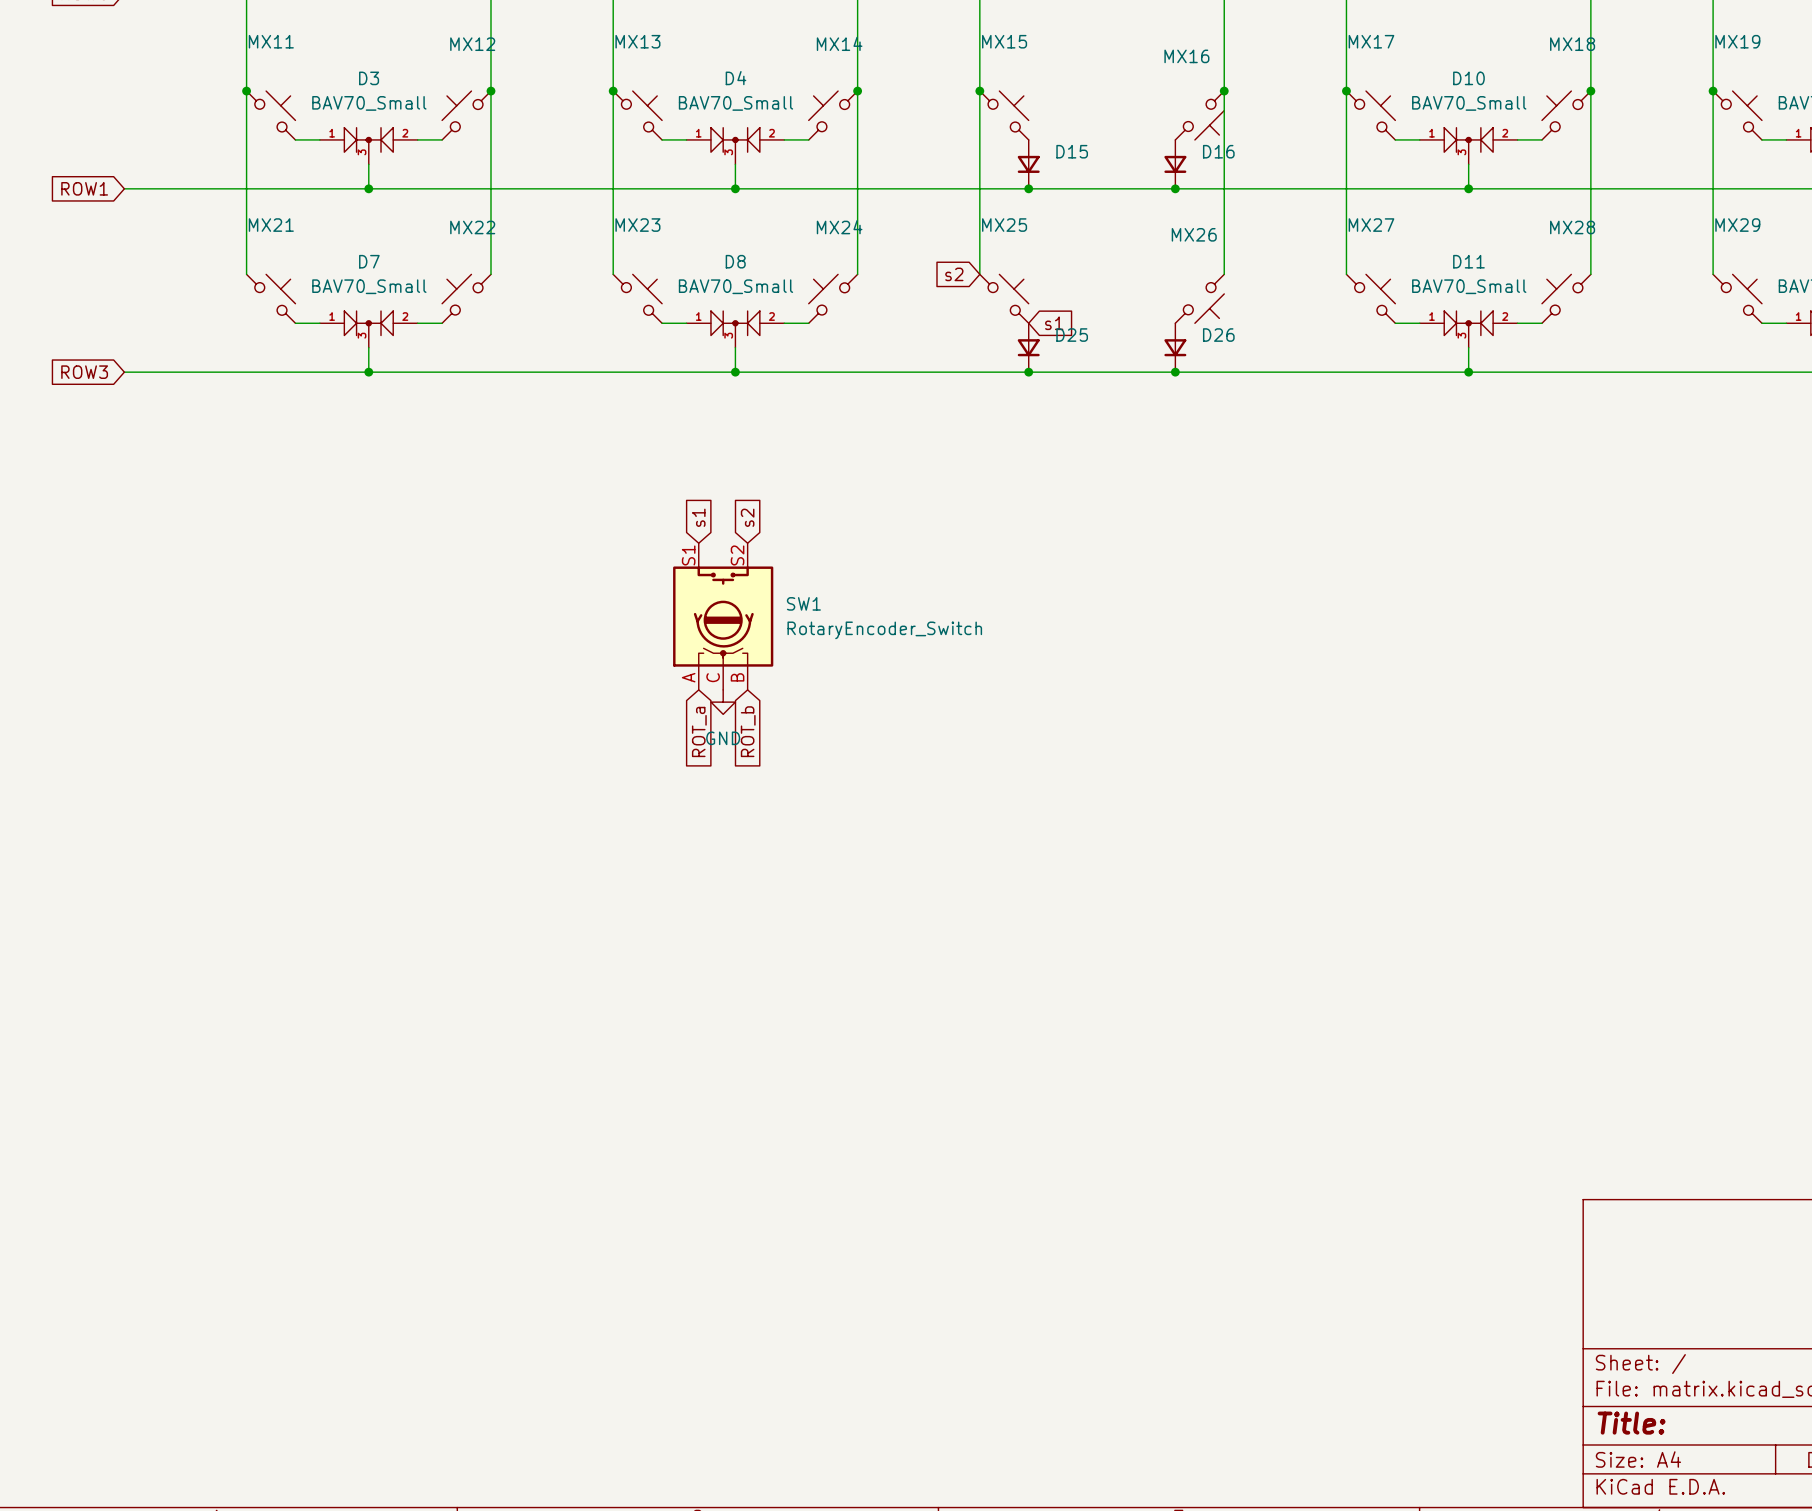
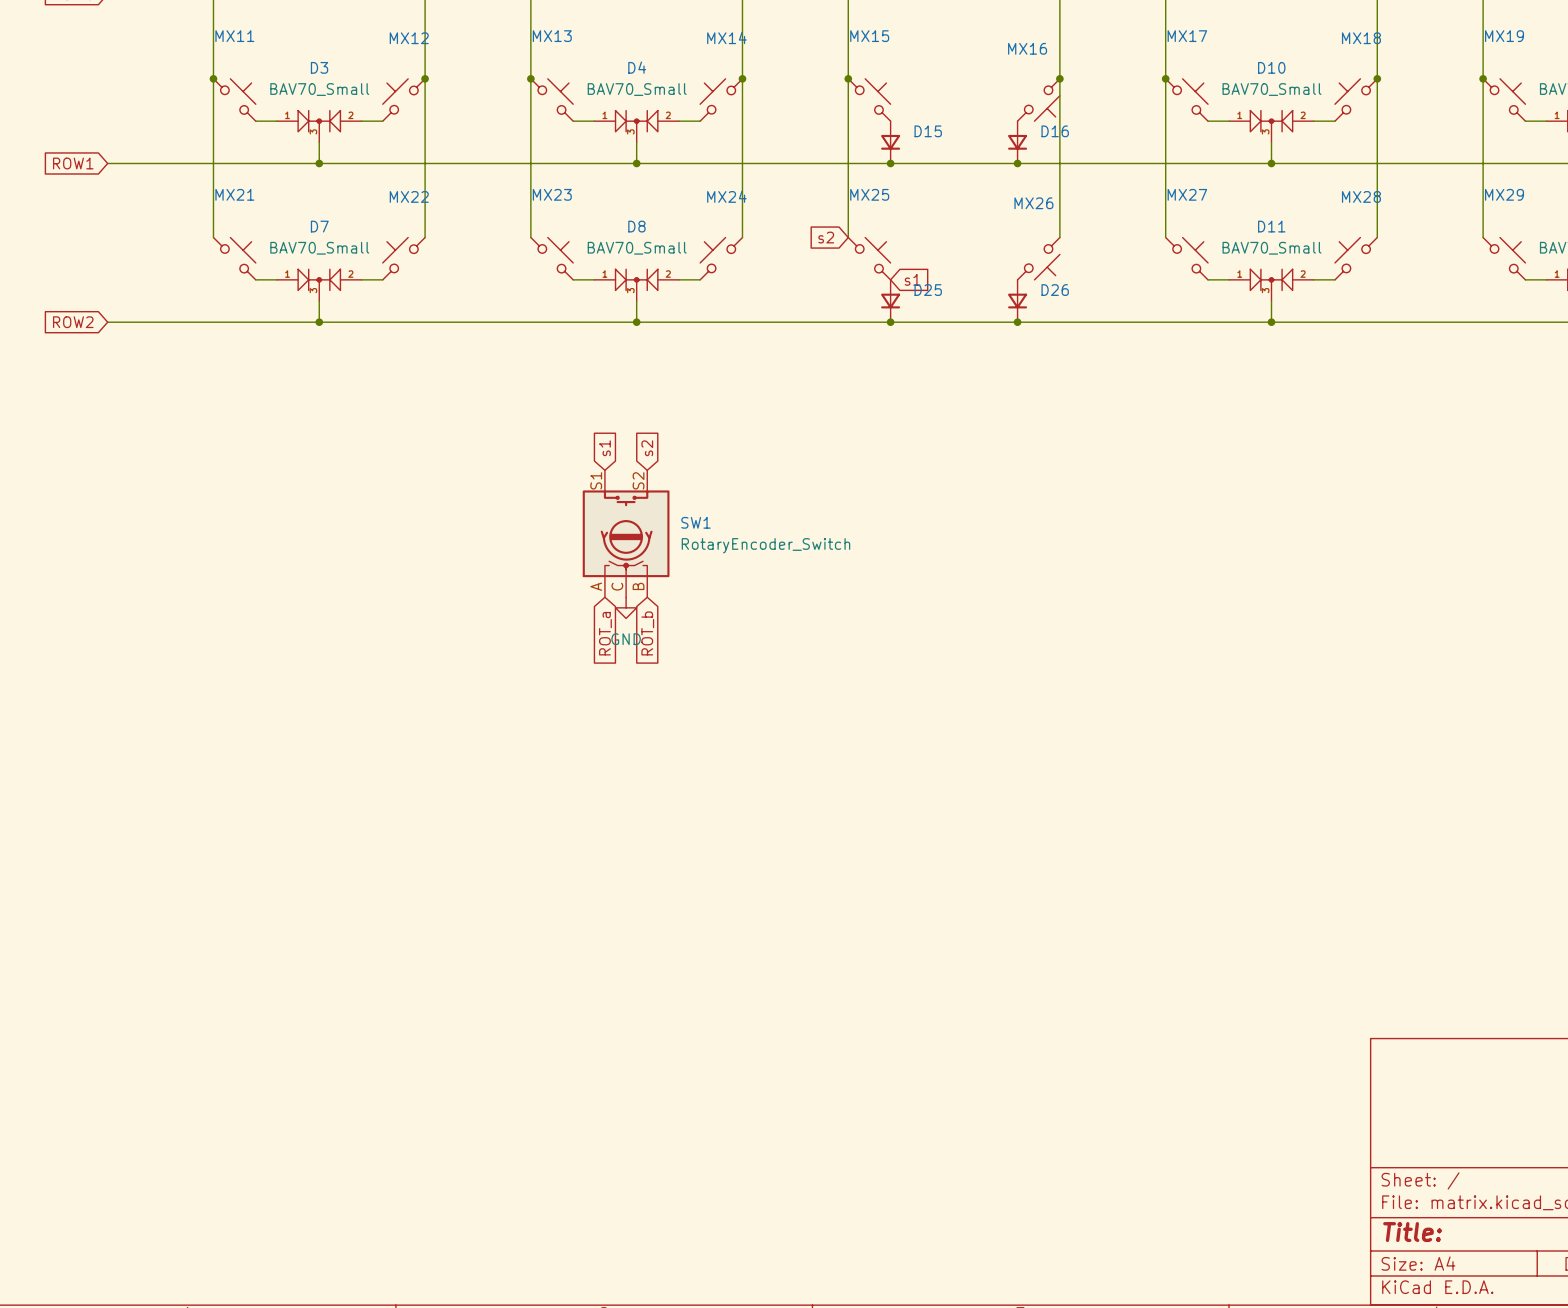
global label: ROW3 (84, 372) -> ROW2 (73, 322)

